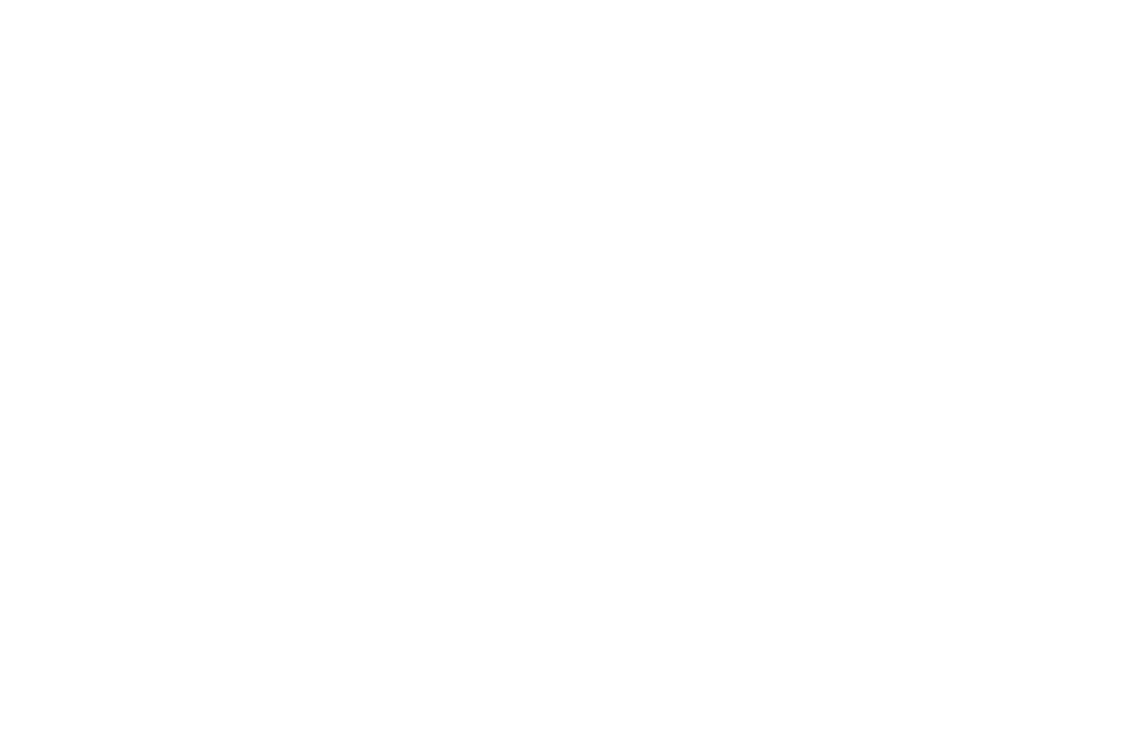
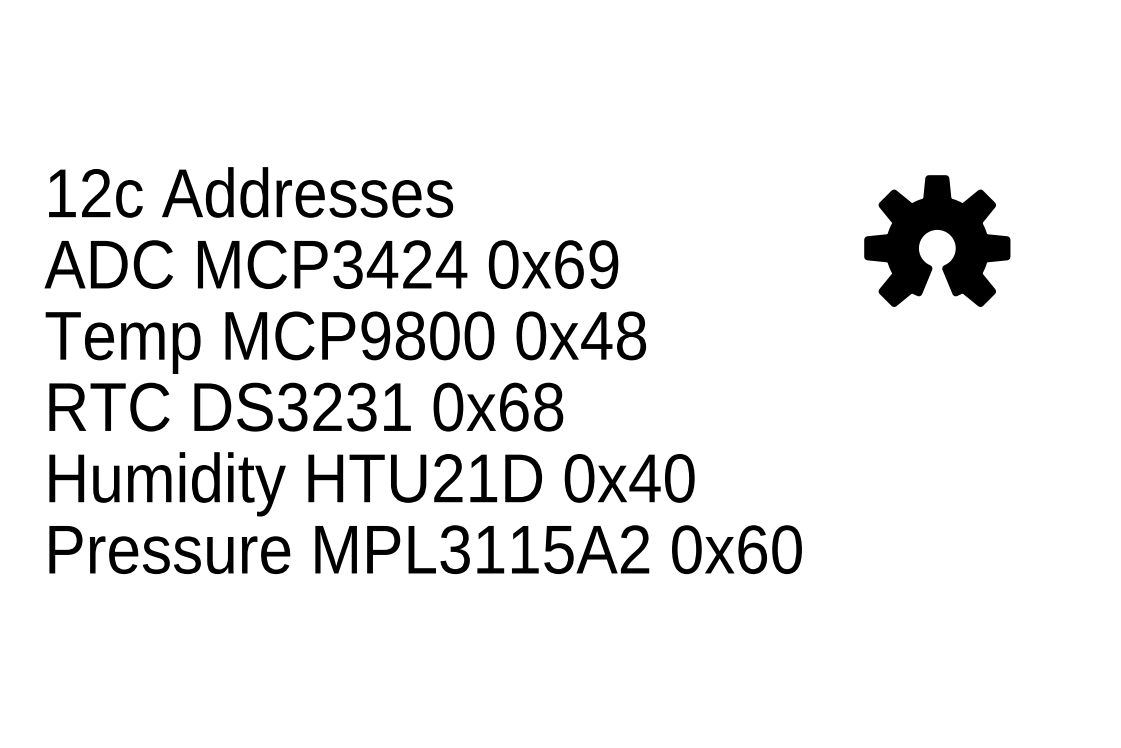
drawing: none -> [864, 175, 1011, 308]
text: none -> 12c Addresses (251, 192)
text: none -> ADC MCP3424 0x69 (331, 264)
text: none -> Temp MCP9800 0x48 (345, 342)
text: none -> RTC DS3231 0x68 (306, 407)
text: none -> Humidity HTU21D 0x40 (372, 484)
text: none -> Pressure MPL3115A2 0x60 (425, 549)

